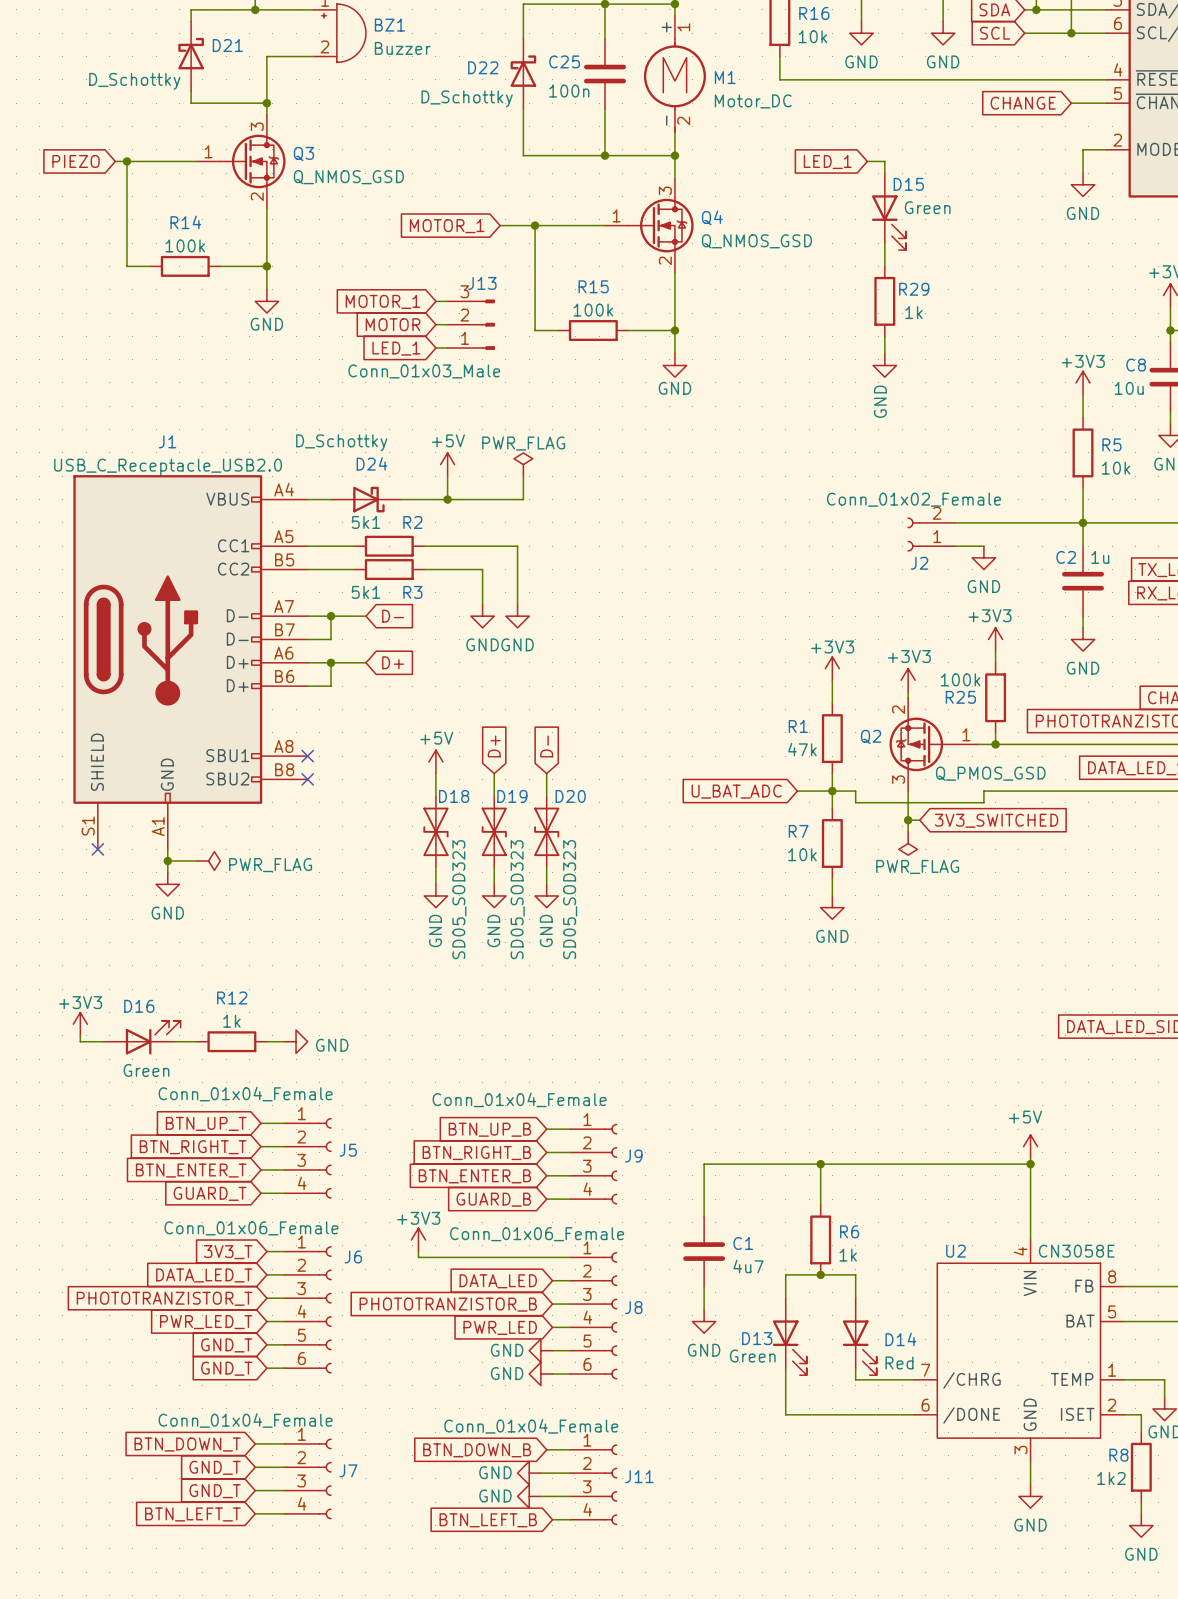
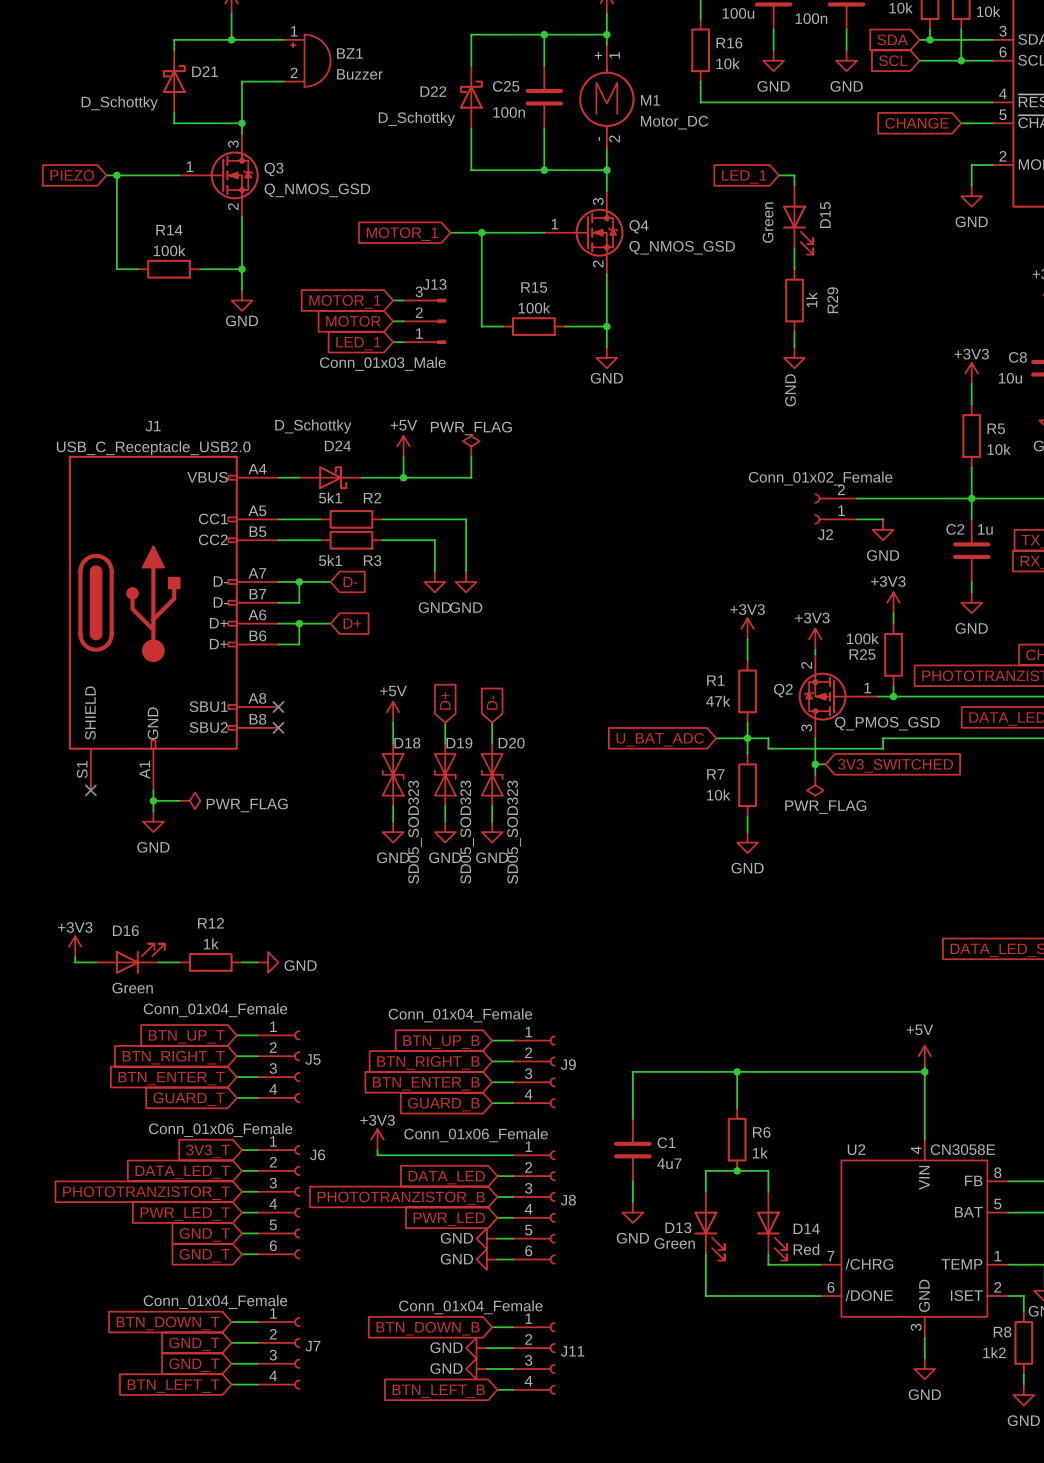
D15 name rotation: 0° (908, 184) -> 90° counterclockwise (825, 215)
D15 value rotation: 0° (927, 207) -> 90° counterclockwise (768, 222)
D15 value position: Green (927, 207) -> Green (768, 222)
R29 name rotation: 0° (914, 289) -> 90° counterclockwise (832, 300)
R29 value rotation: 0° (913, 312) -> 90° counterclockwise (811, 299)
power symbol text rotation: 0° (435, 930) -> 90° clockwise (393, 857)
power symbol text rotation: 0° (493, 930) -> 90° clockwise (445, 857)
power symbol text rotation: 0° (546, 930) -> 90° clockwise (492, 857)

